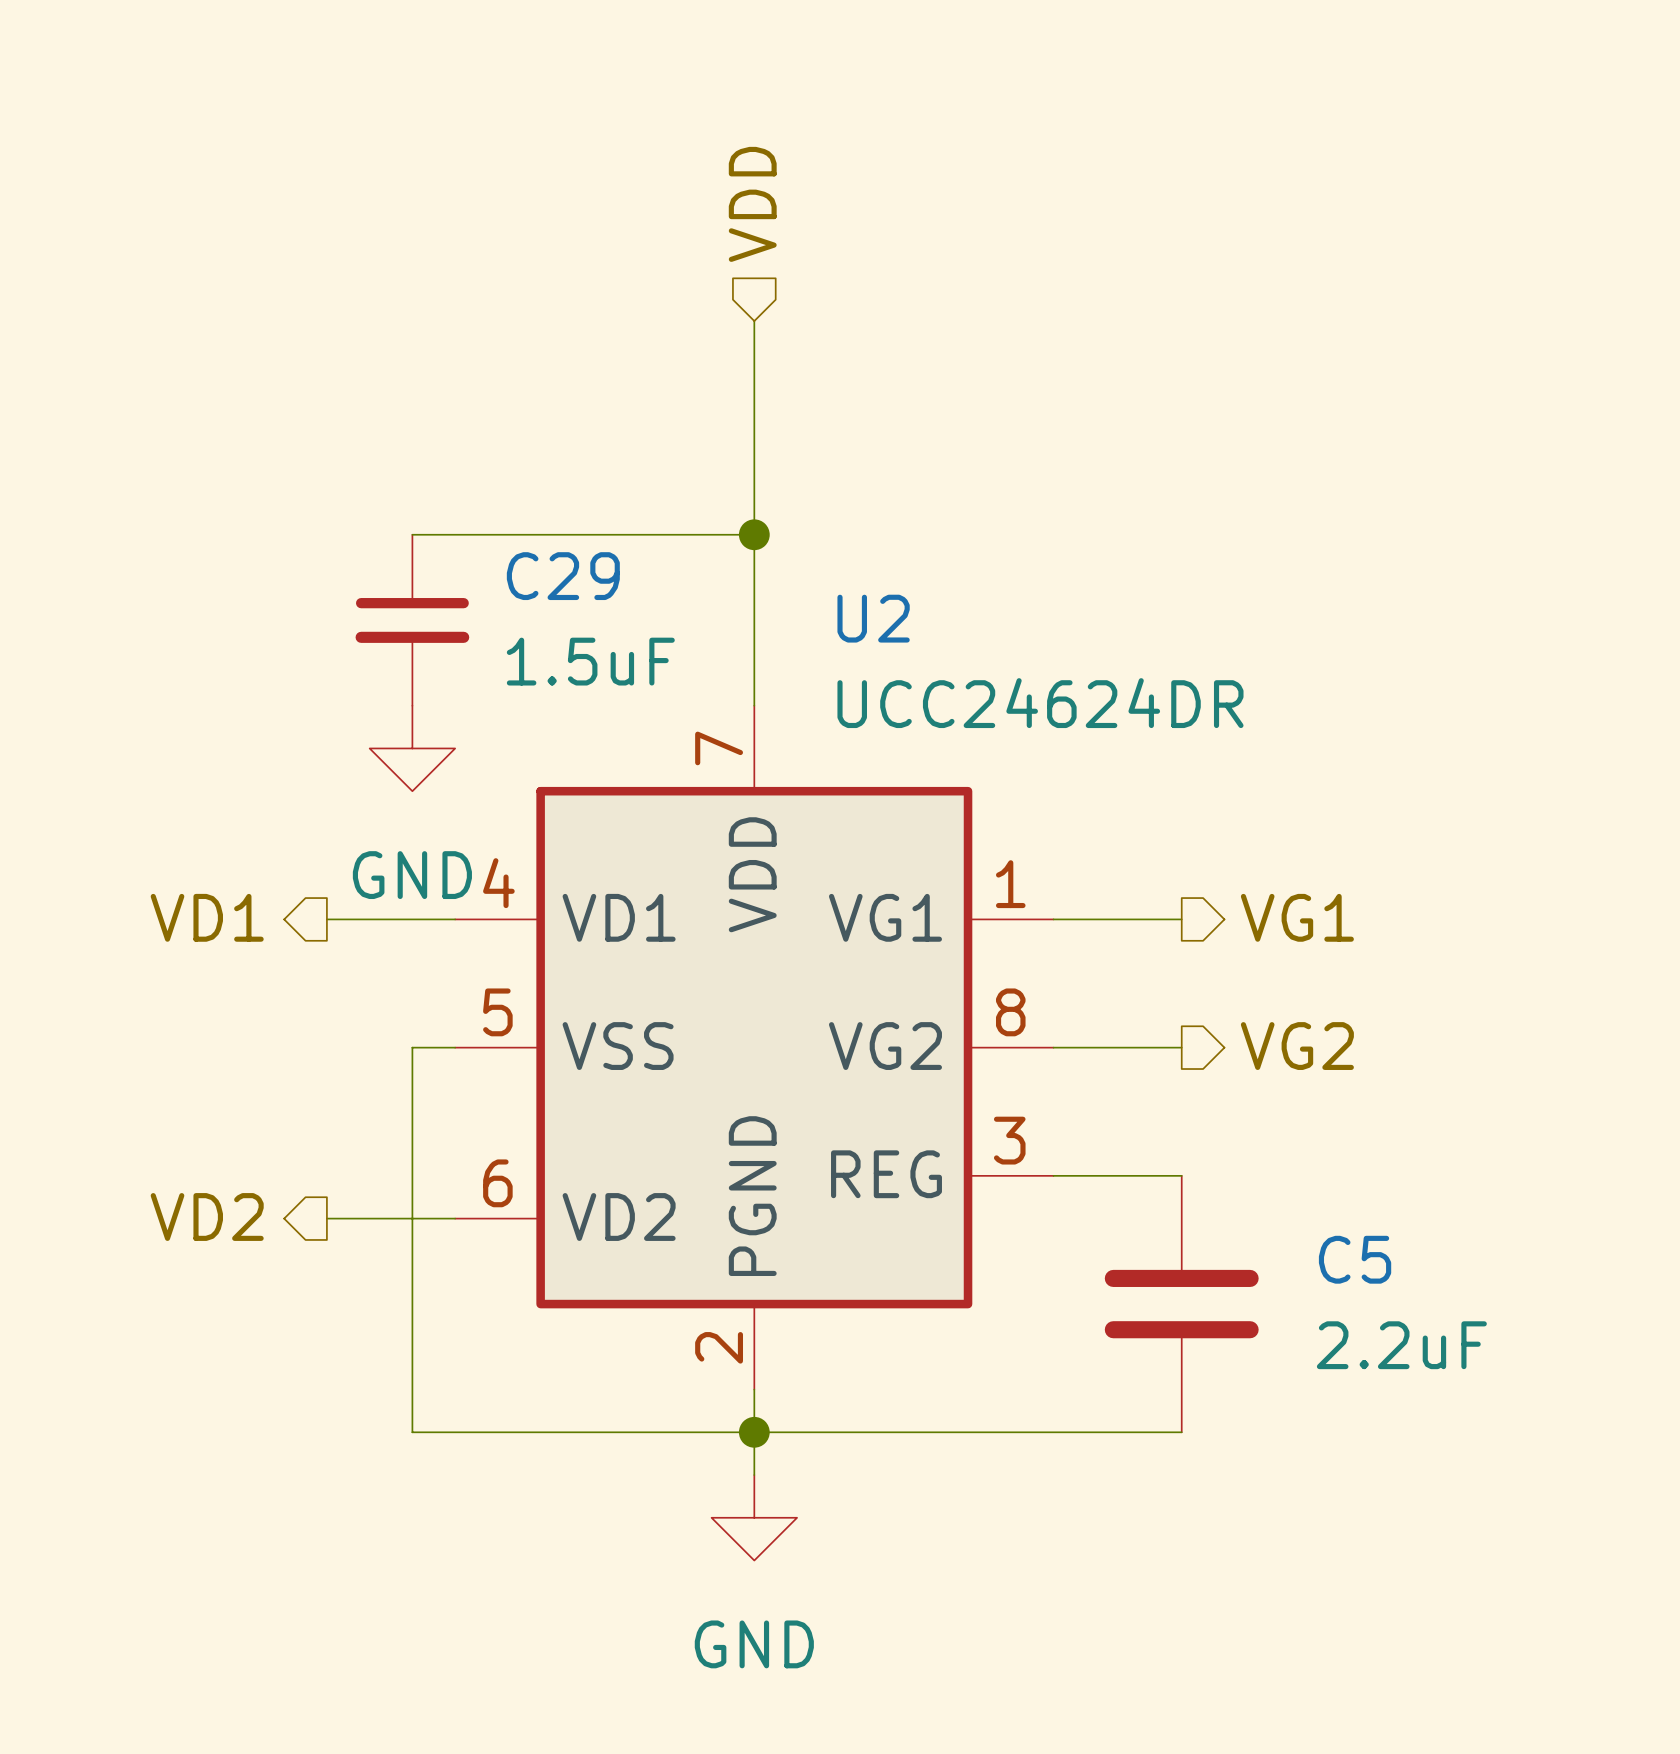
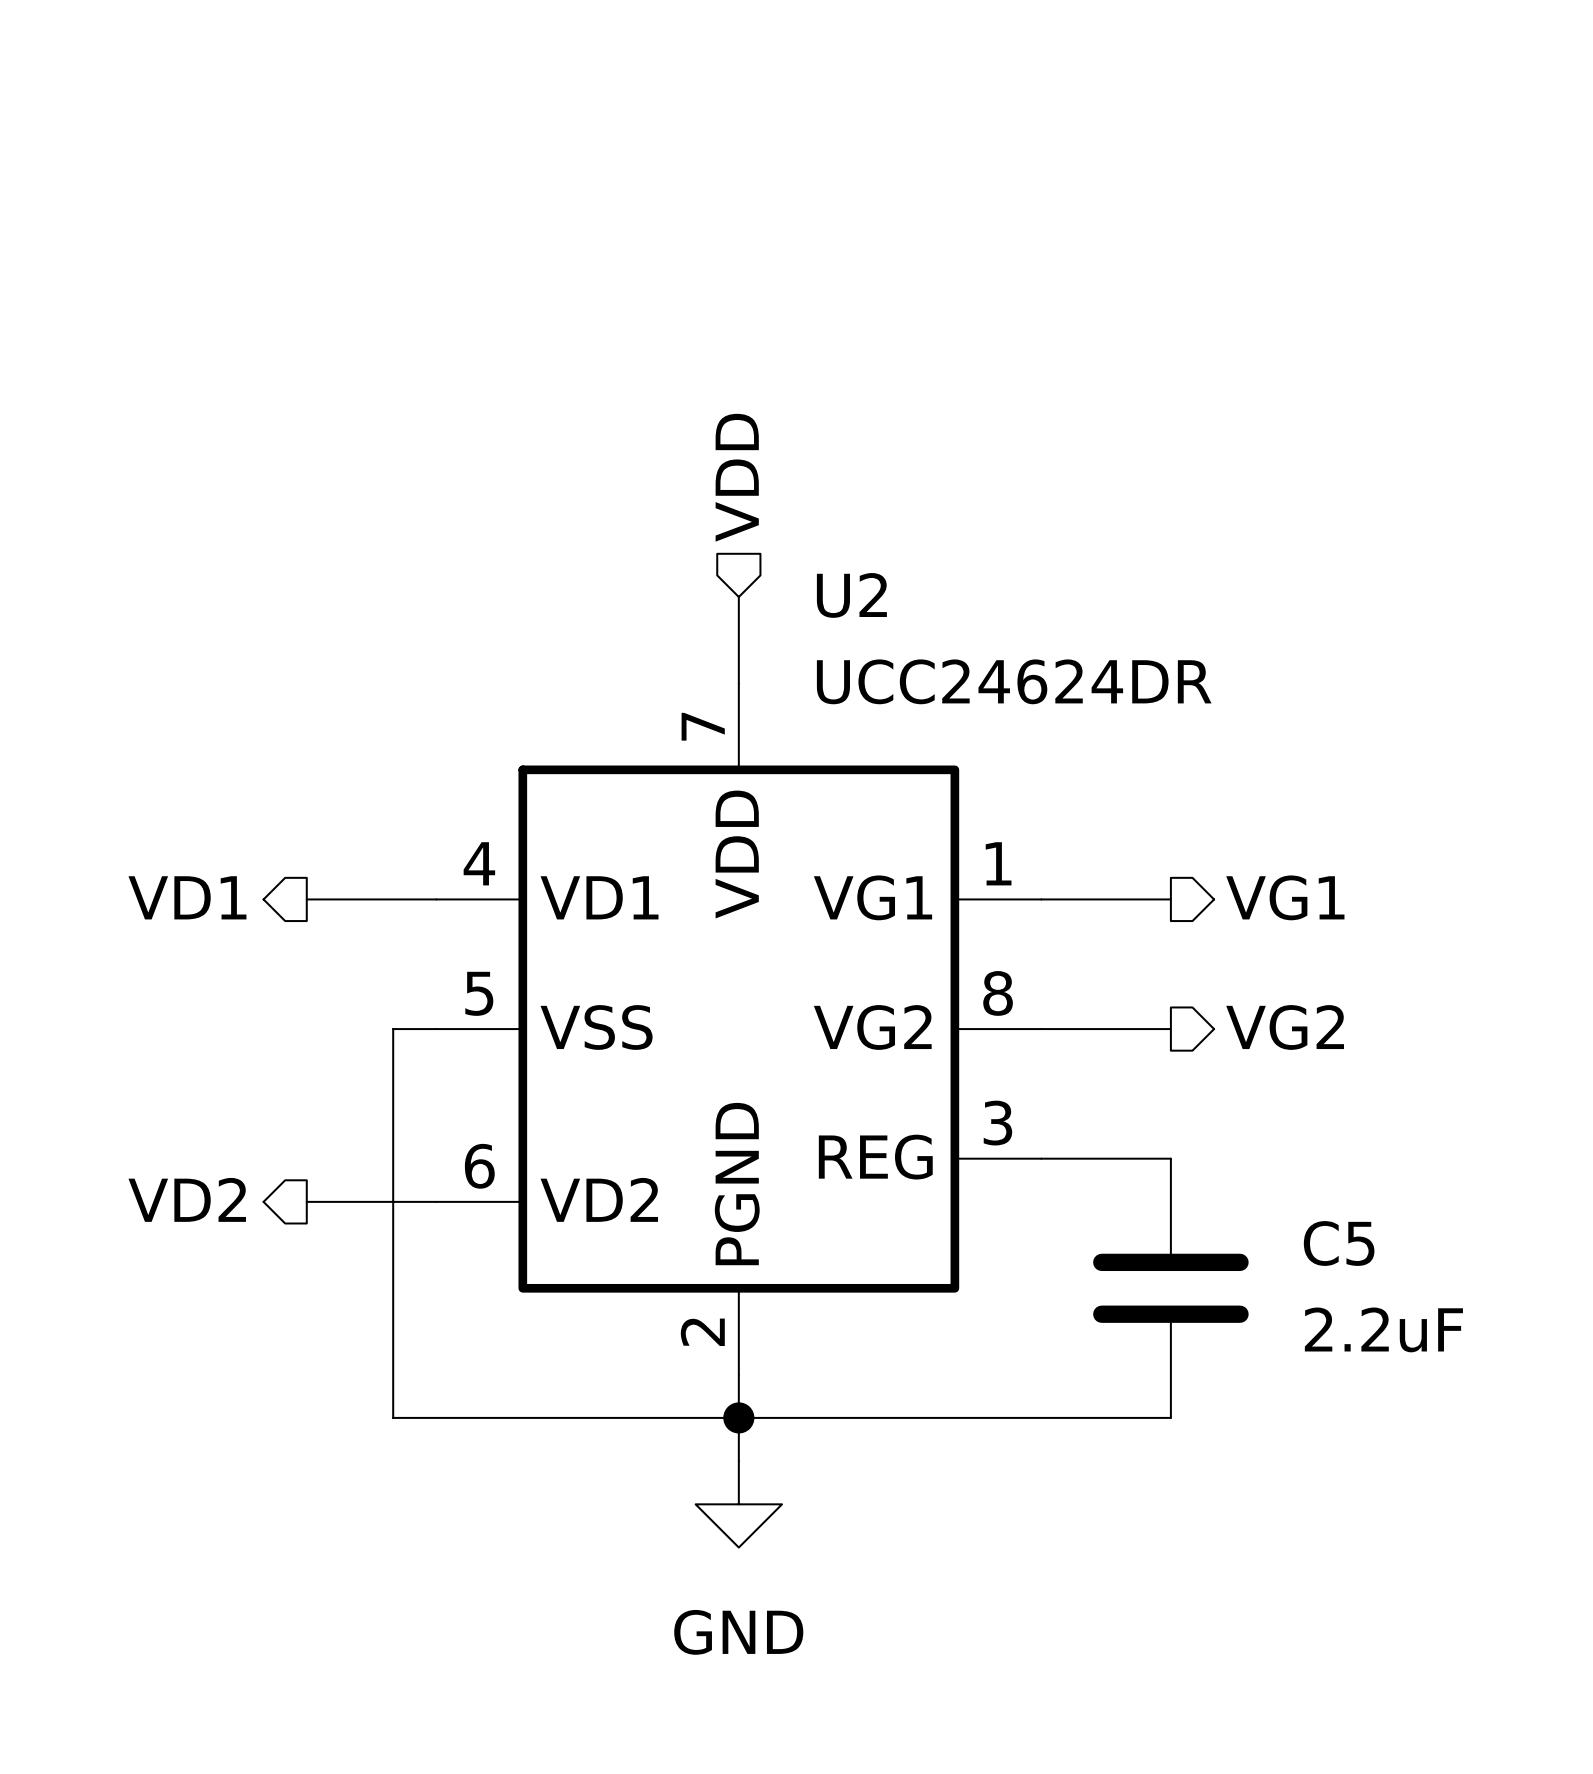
hierarchical label position: VDD (752, 204) -> VDD (737, 477)
wire: (754, 321) (754, 620) -> none
wire: (412, 534) (754, 534) -> none
junction: (754, 534) -> none
C29: 1.5uF (412, 620) -> none
power symbol: GND (412, 748) -> none

